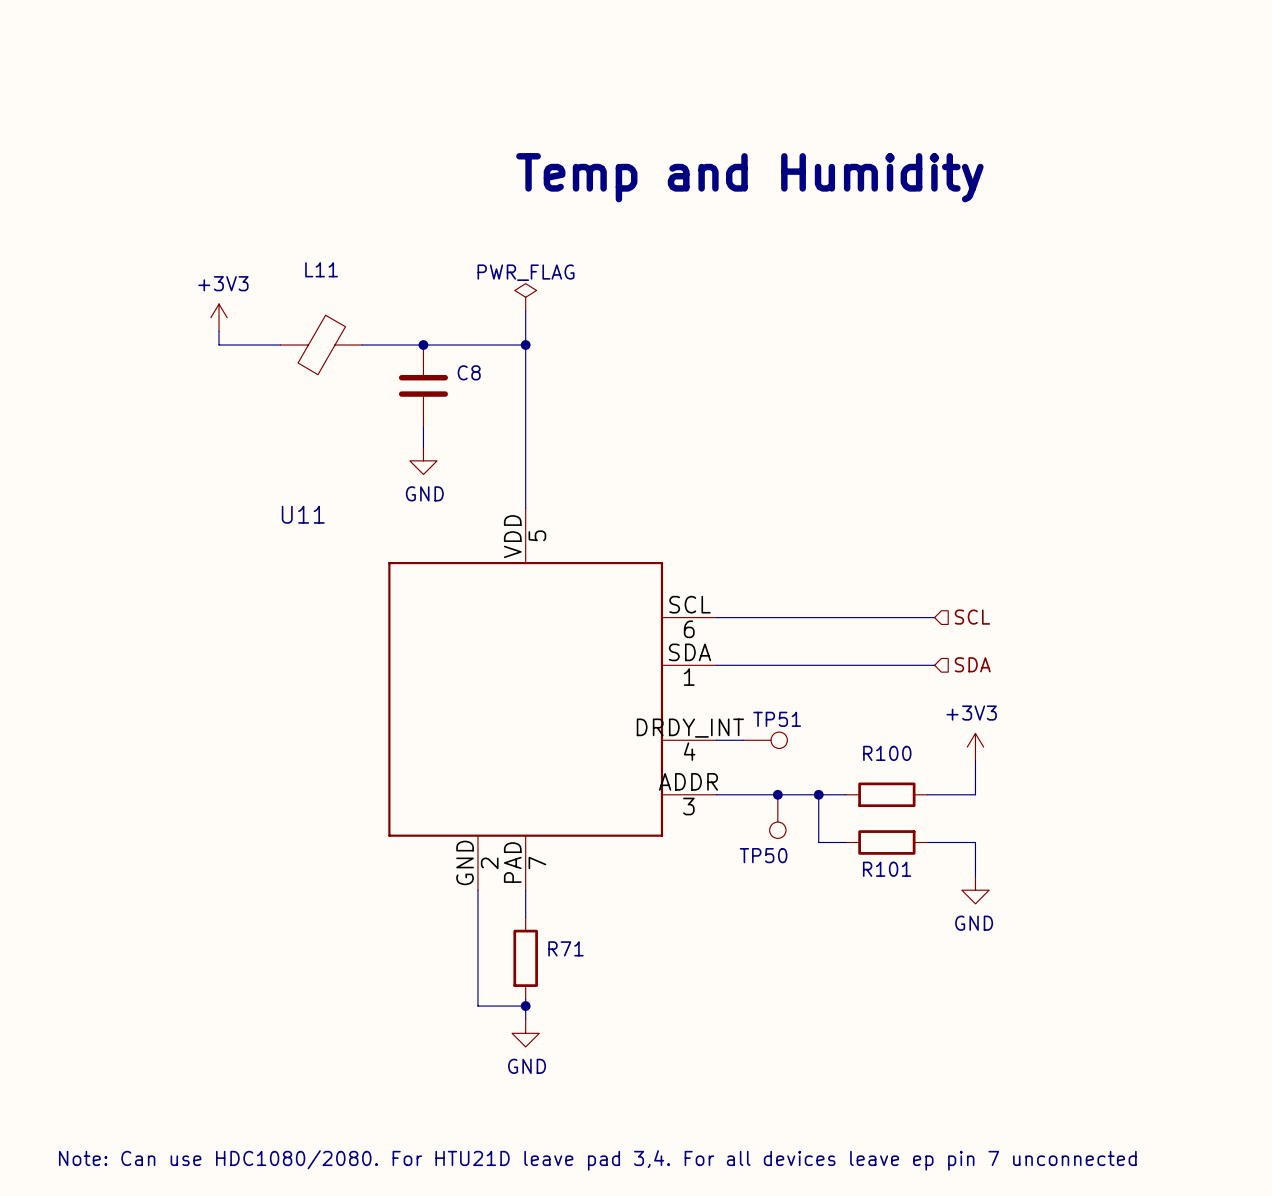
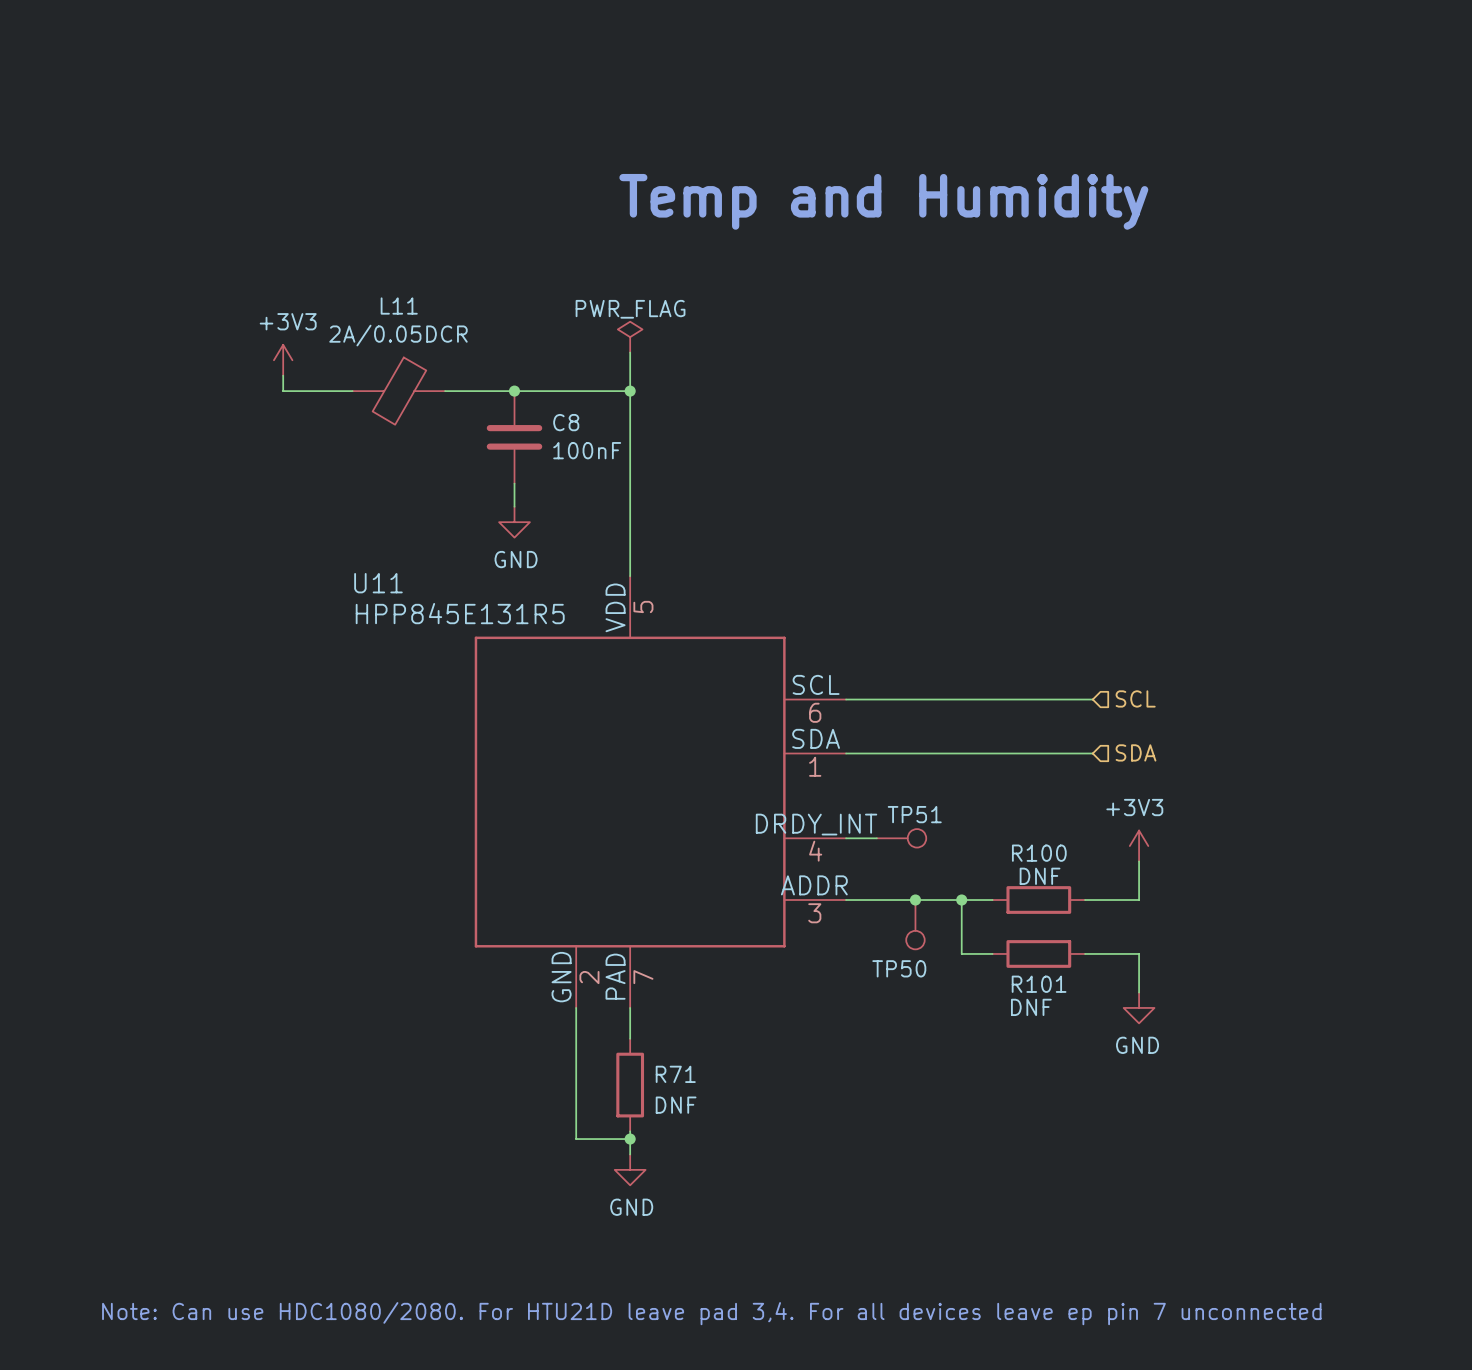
L11 value: none -> 2A/0.05DCR (398, 335)
C8 value: none -> 100nF (587, 450)
U11 value: none -> HPP845E131R5 (460, 613)
R100 value: none -> DNF (1040, 876)
R101 value: none -> DNF (1031, 1007)
R71 value: none -> DNF (676, 1105)

